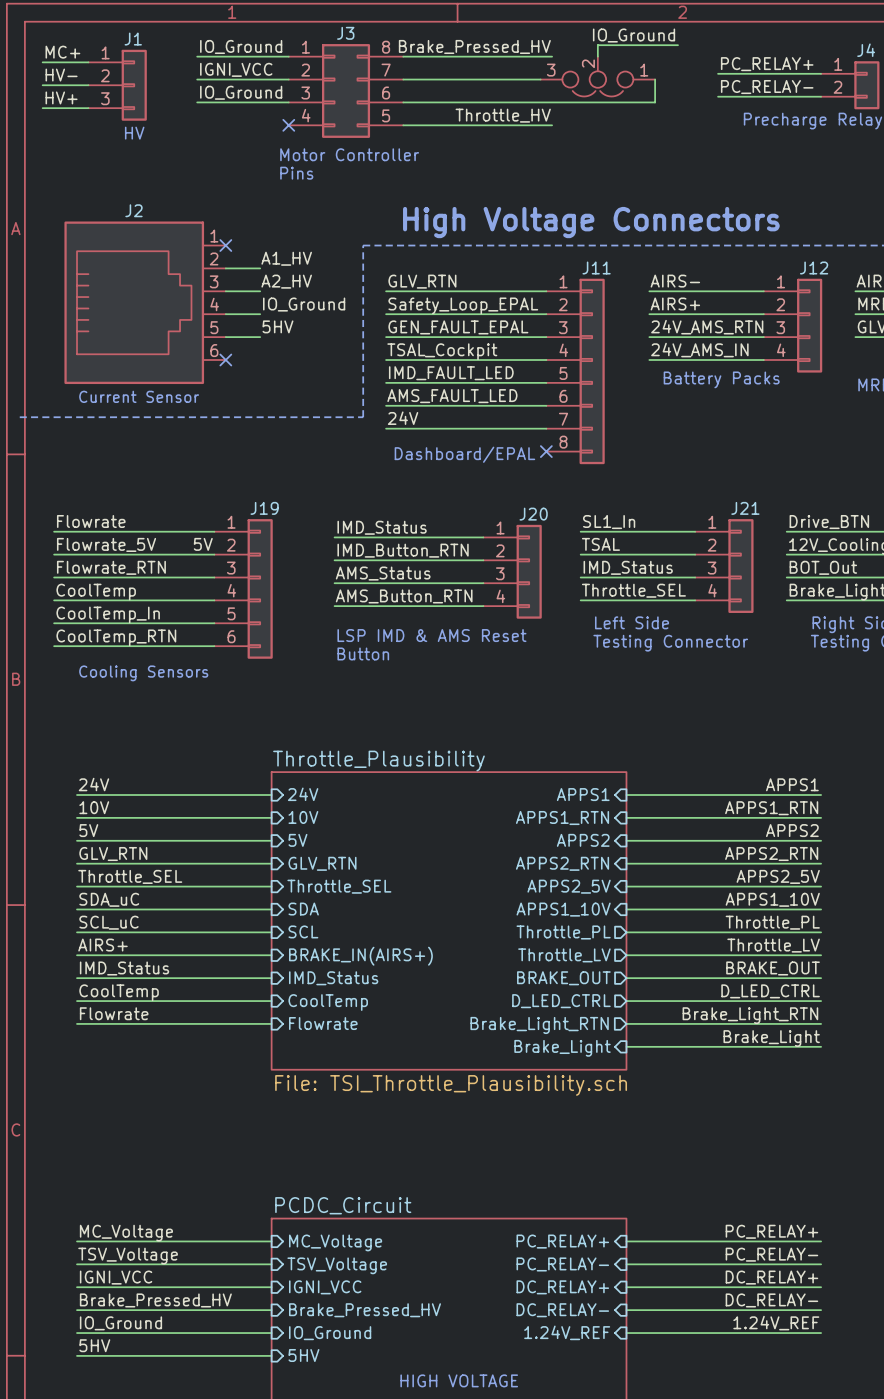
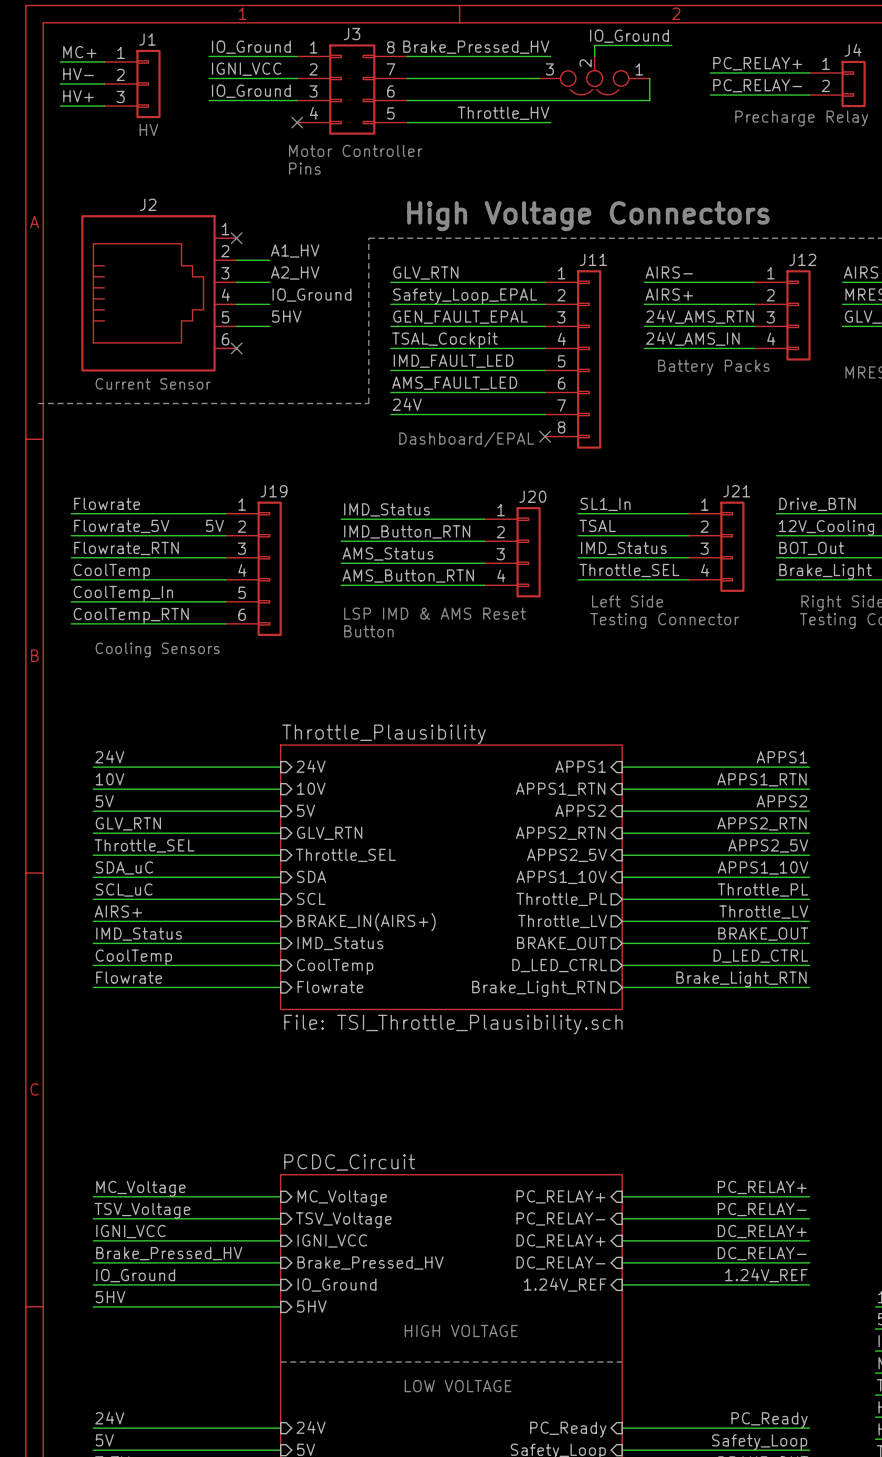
sheet Throttle_Plausibility: none -> File: TSI_Throttle_Plausibility.sch (451, 877)
sheet Throttle_Plausibility: File: TSI_Throttle_Plausibility.sch (449, 920) -> none
label: Brake_Light (771, 1038) -> none
wire: (626, 1046) (821, 1046) -> none
sheet pin: Brake_Light (562, 1048) -> none

